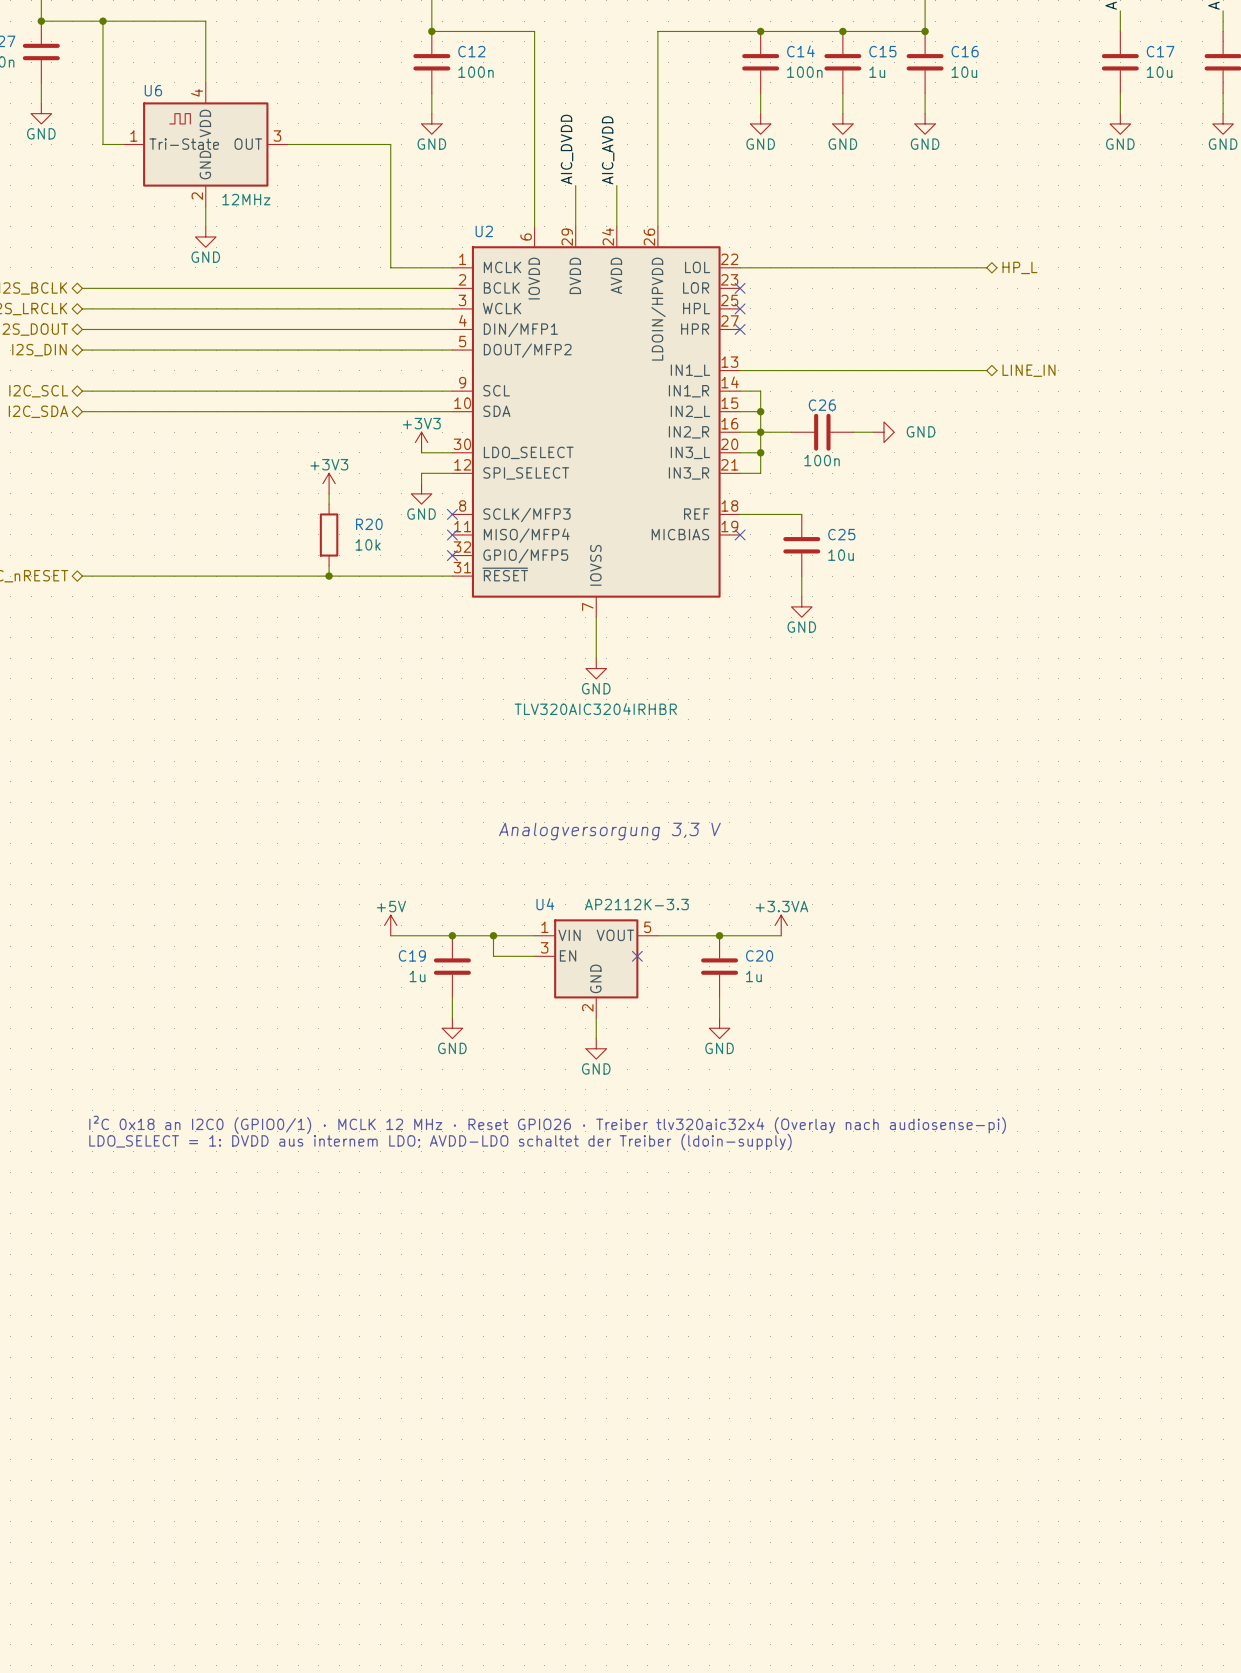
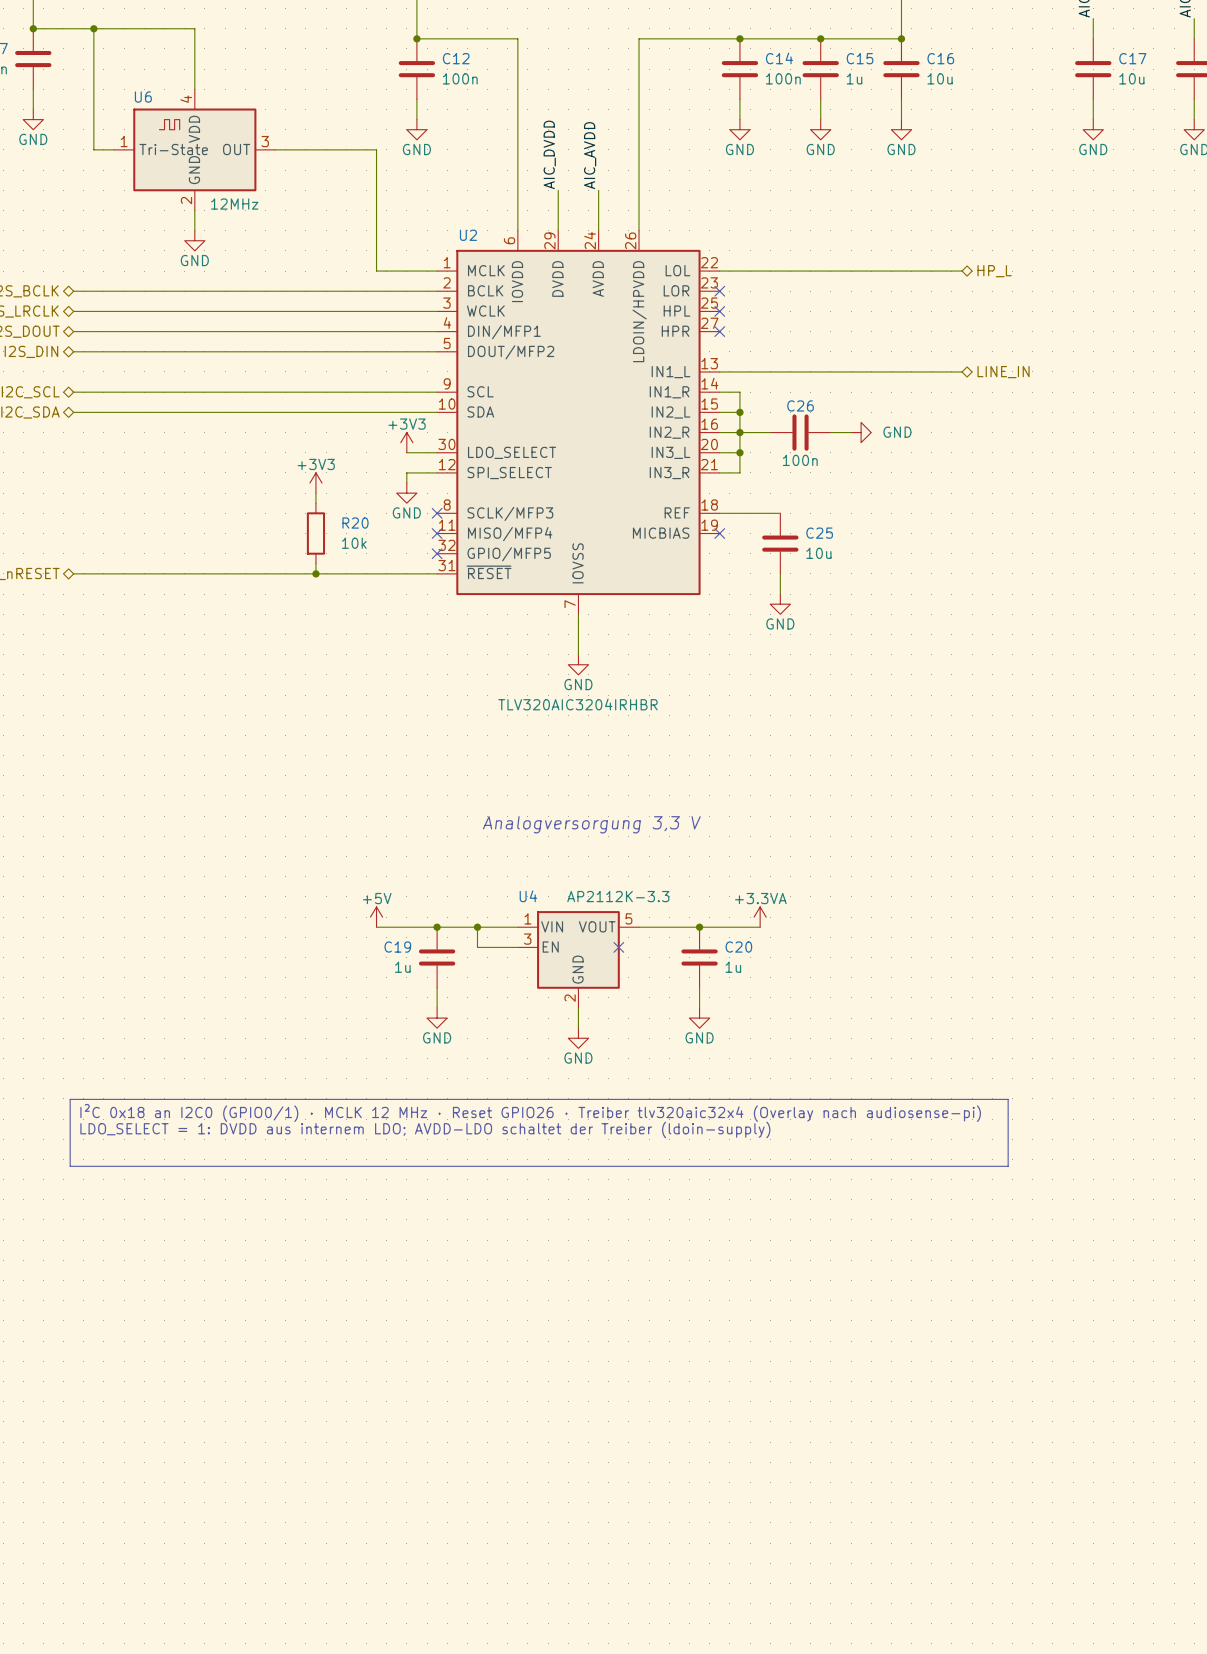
line: none -> (70, 1099) (1008, 1099) (1008, 1166) (70, 1166) (70, 1099)

